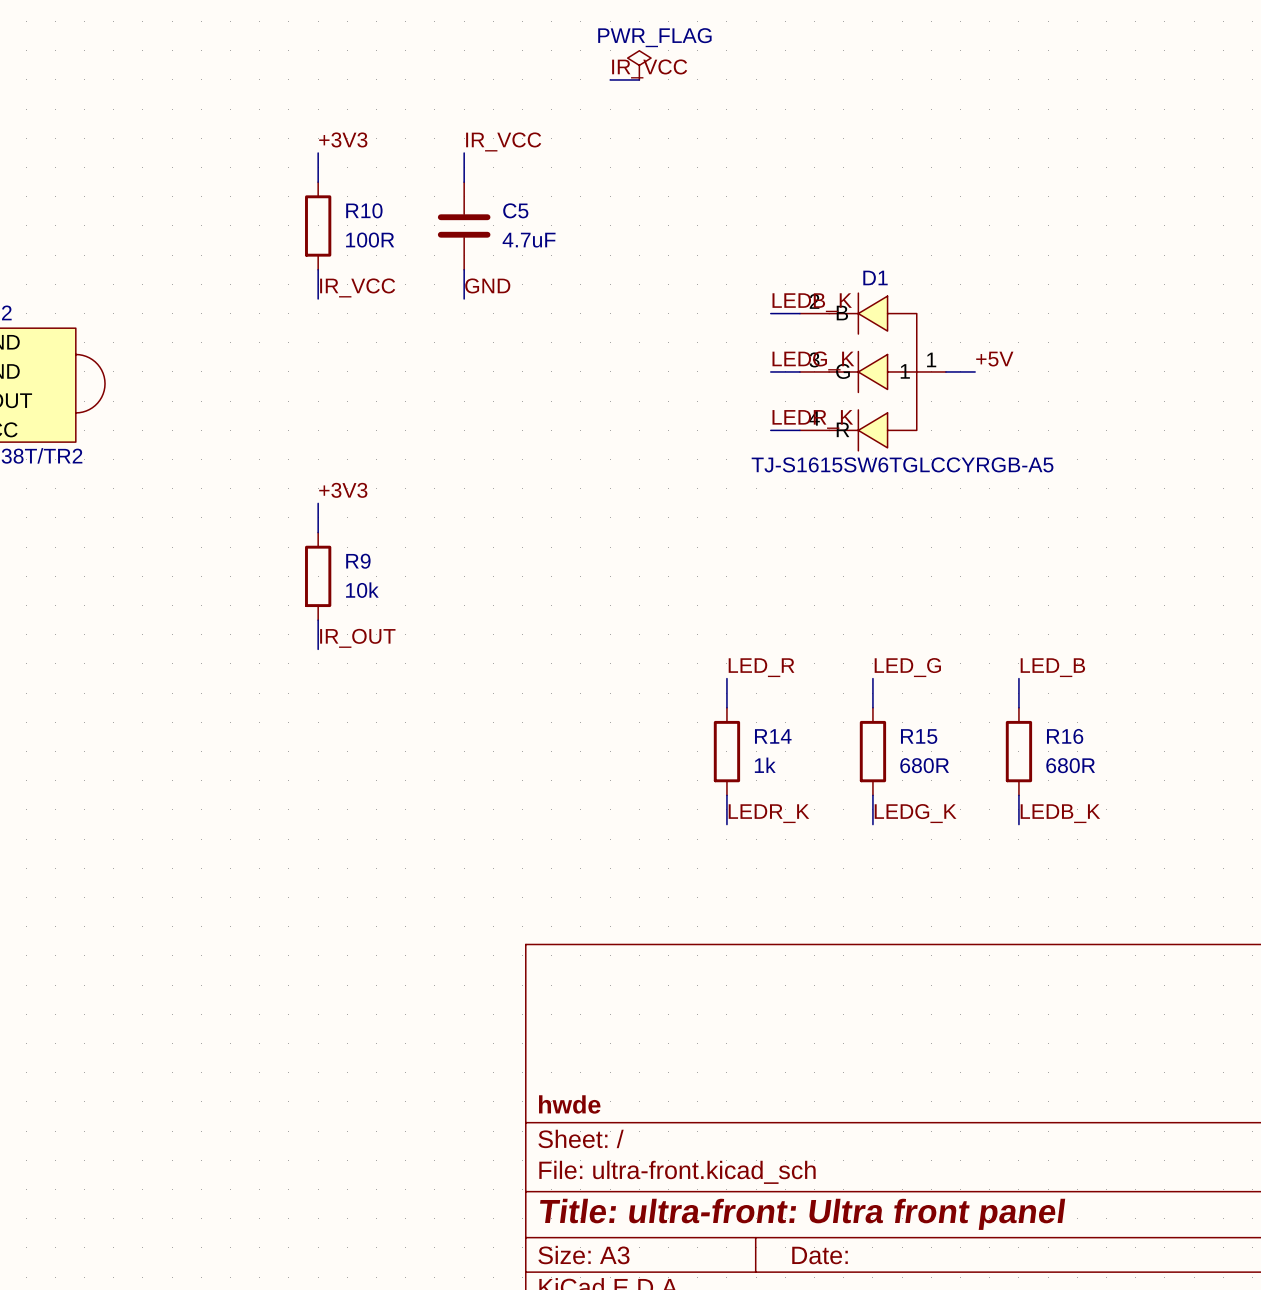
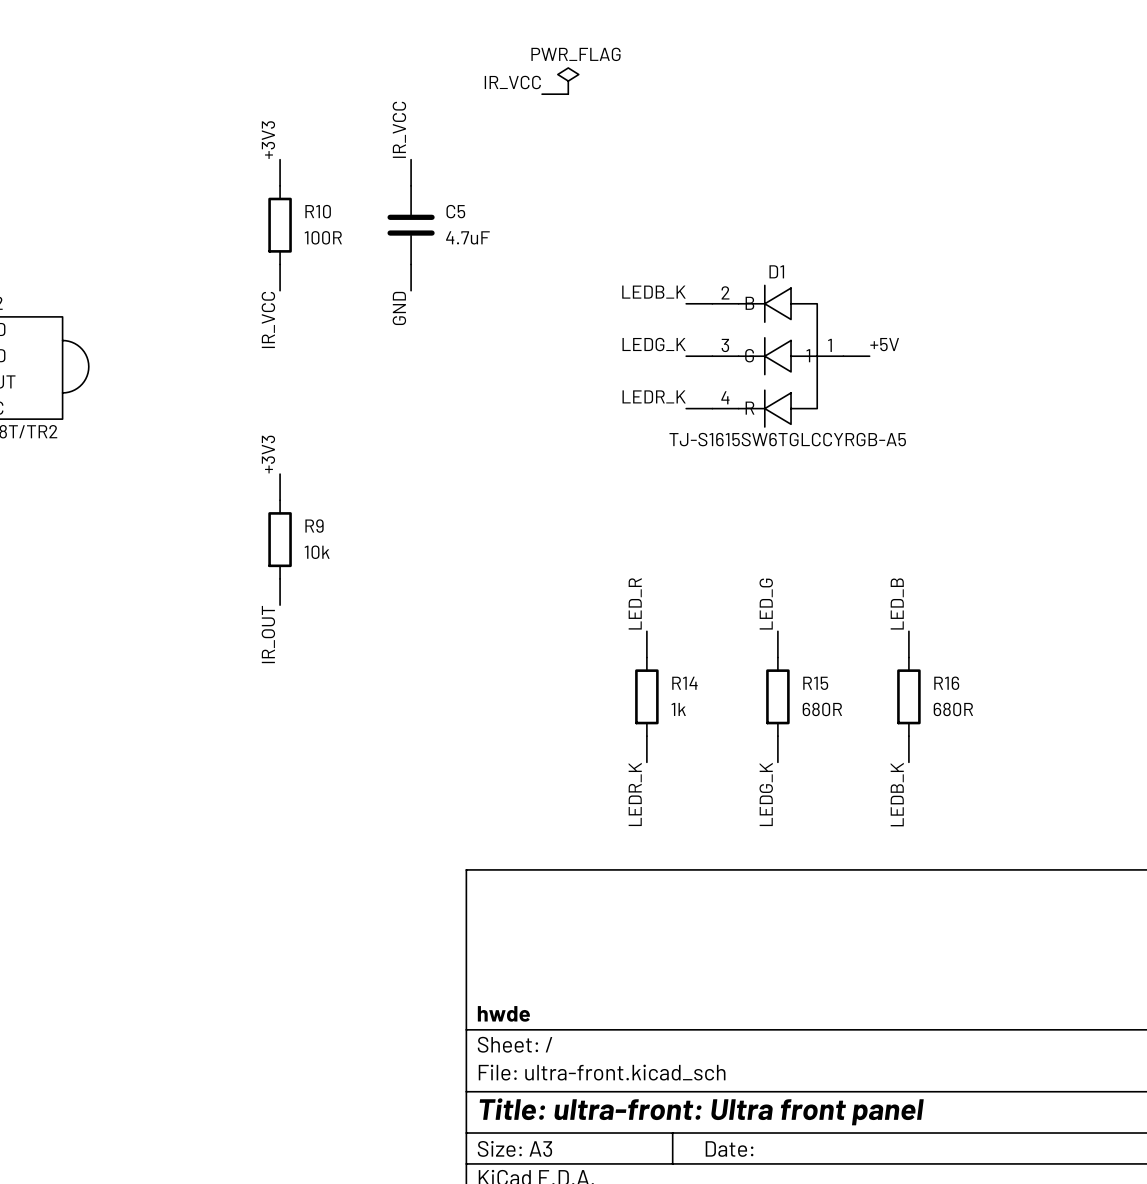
label position: IR_VCC (649, 68) -> IR_VCC (512, 82)
label rotation: 0° (343, 139) -> 90° counterclockwise (268, 140)
label rotation: 0° (503, 141) -> 90° counterclockwise (399, 129)
label rotation: 0° (487, 285) -> 90° counterclockwise (399, 308)
label position: GND (487, 285) -> GND (399, 308)
label rotation: 0° (357, 287) -> 90° counterclockwise (268, 319)
label position: LEDB_K (812, 302) -> LEDB_K (653, 292)
label position: LEDG_K (813, 360) -> LEDG_K (654, 344)
label position: LEDR_K (812, 419) -> LEDR_K (654, 396)
label rotation: 0° (343, 490) -> 90° counterclockwise (268, 454)
label rotation: 0° (357, 638) -> 90° counterclockwise (268, 634)
label rotation: 0° (761, 667) -> 90° counterclockwise (635, 603)
label rotation: 0° (907, 667) -> 90° counterclockwise (766, 604)
label rotation: 0° (1052, 667) -> 90° counterclockwise (897, 603)
label rotation: 0° (768, 813) -> 90° counterclockwise (635, 794)
label rotation: 0° (915, 813) -> 90° counterclockwise (766, 794)
label rotation: 0° (1060, 813) -> 90° counterclockwise (897, 794)

